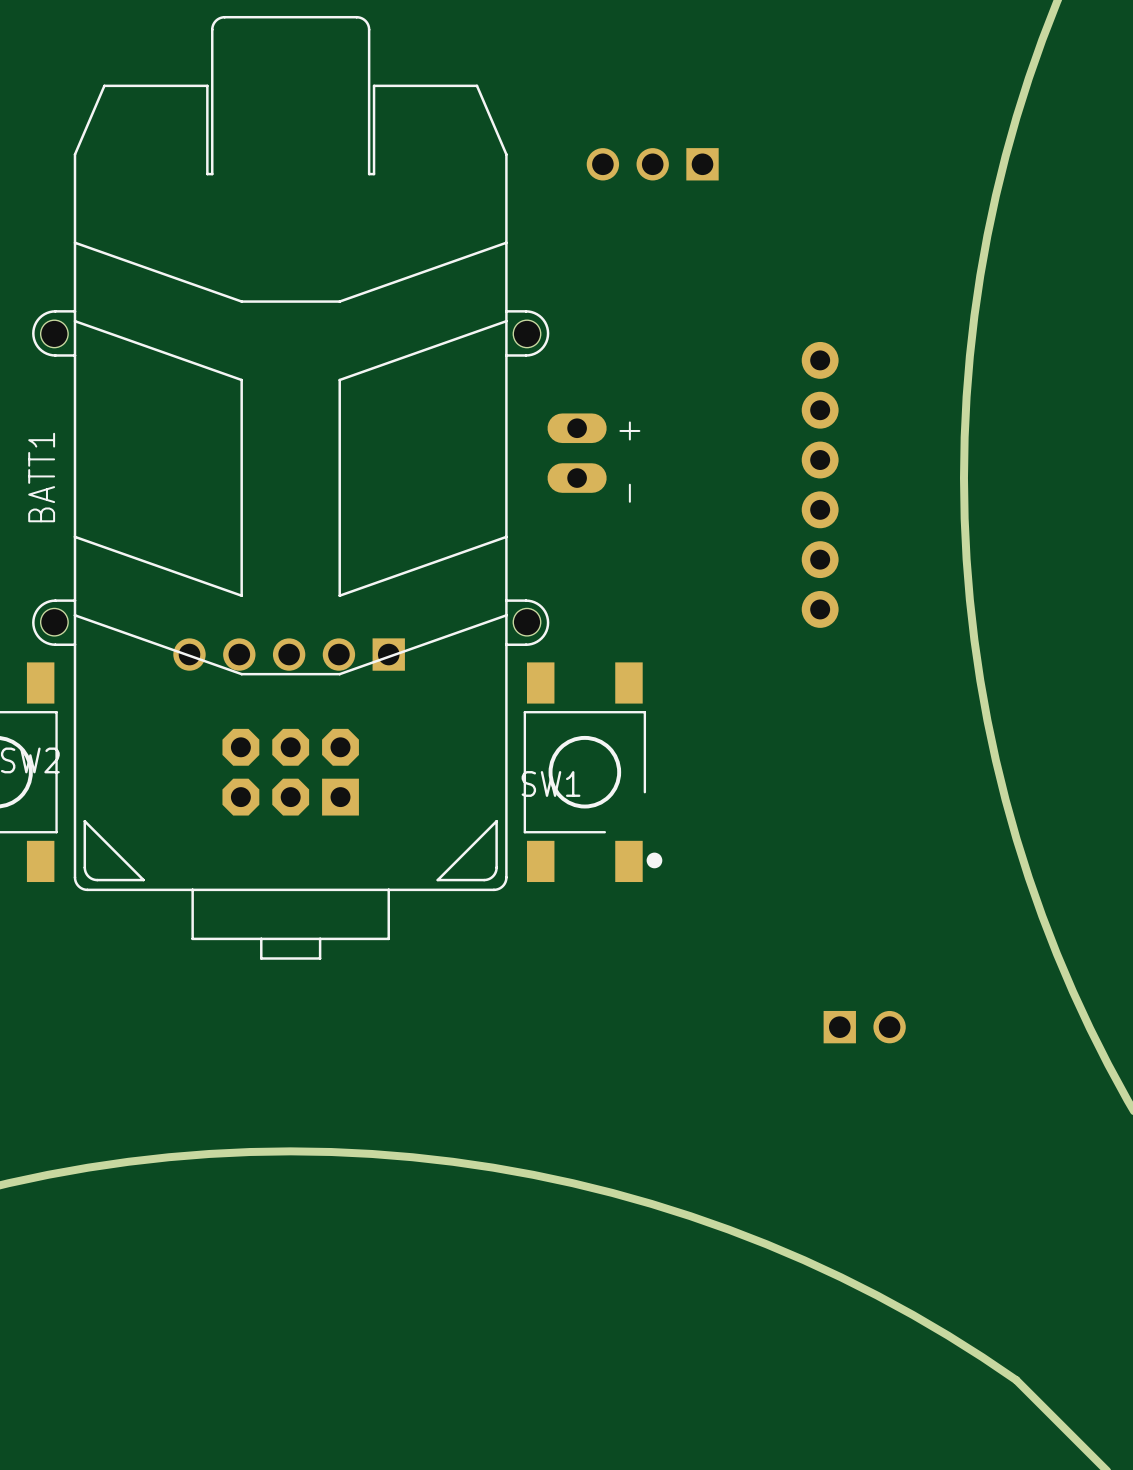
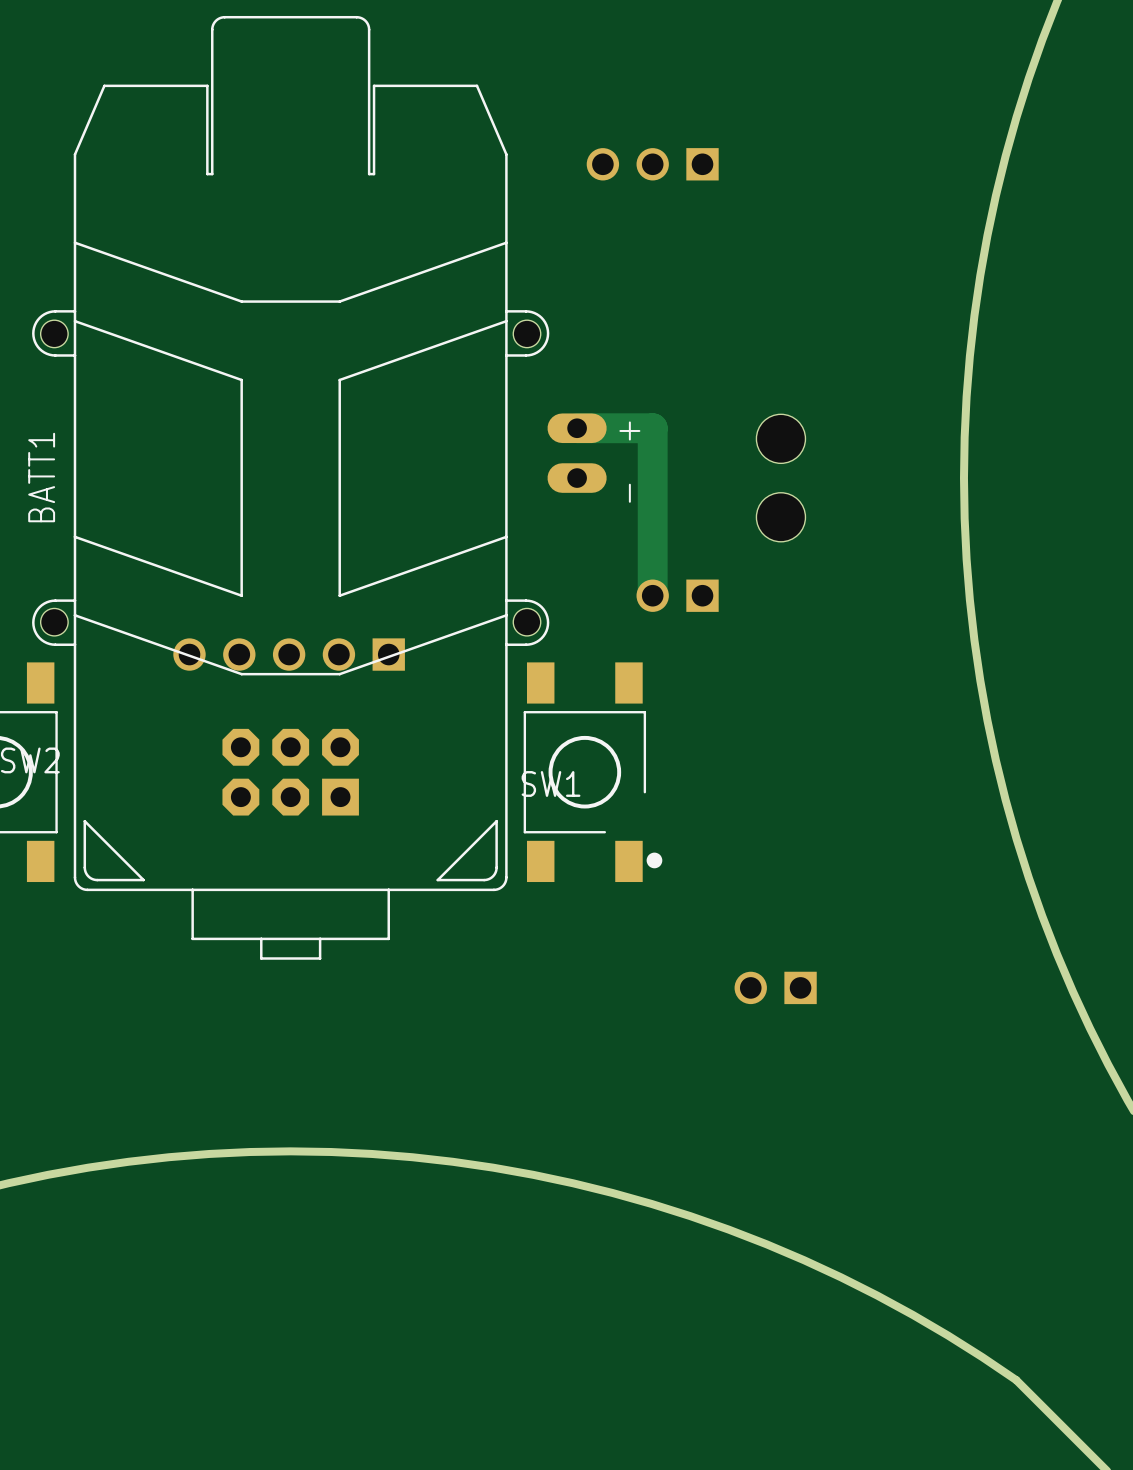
track: none -> (577, 428) (652, 428) (652, 595)
hole: none -> (780, 438)
part: (820, 484) -> none
hole: none -> (780, 517)
part: none -> (677, 595)
part rotation: 0° (864, 1027) -> 180° (775, 987)
part position: (864, 1027) -> (775, 987)

